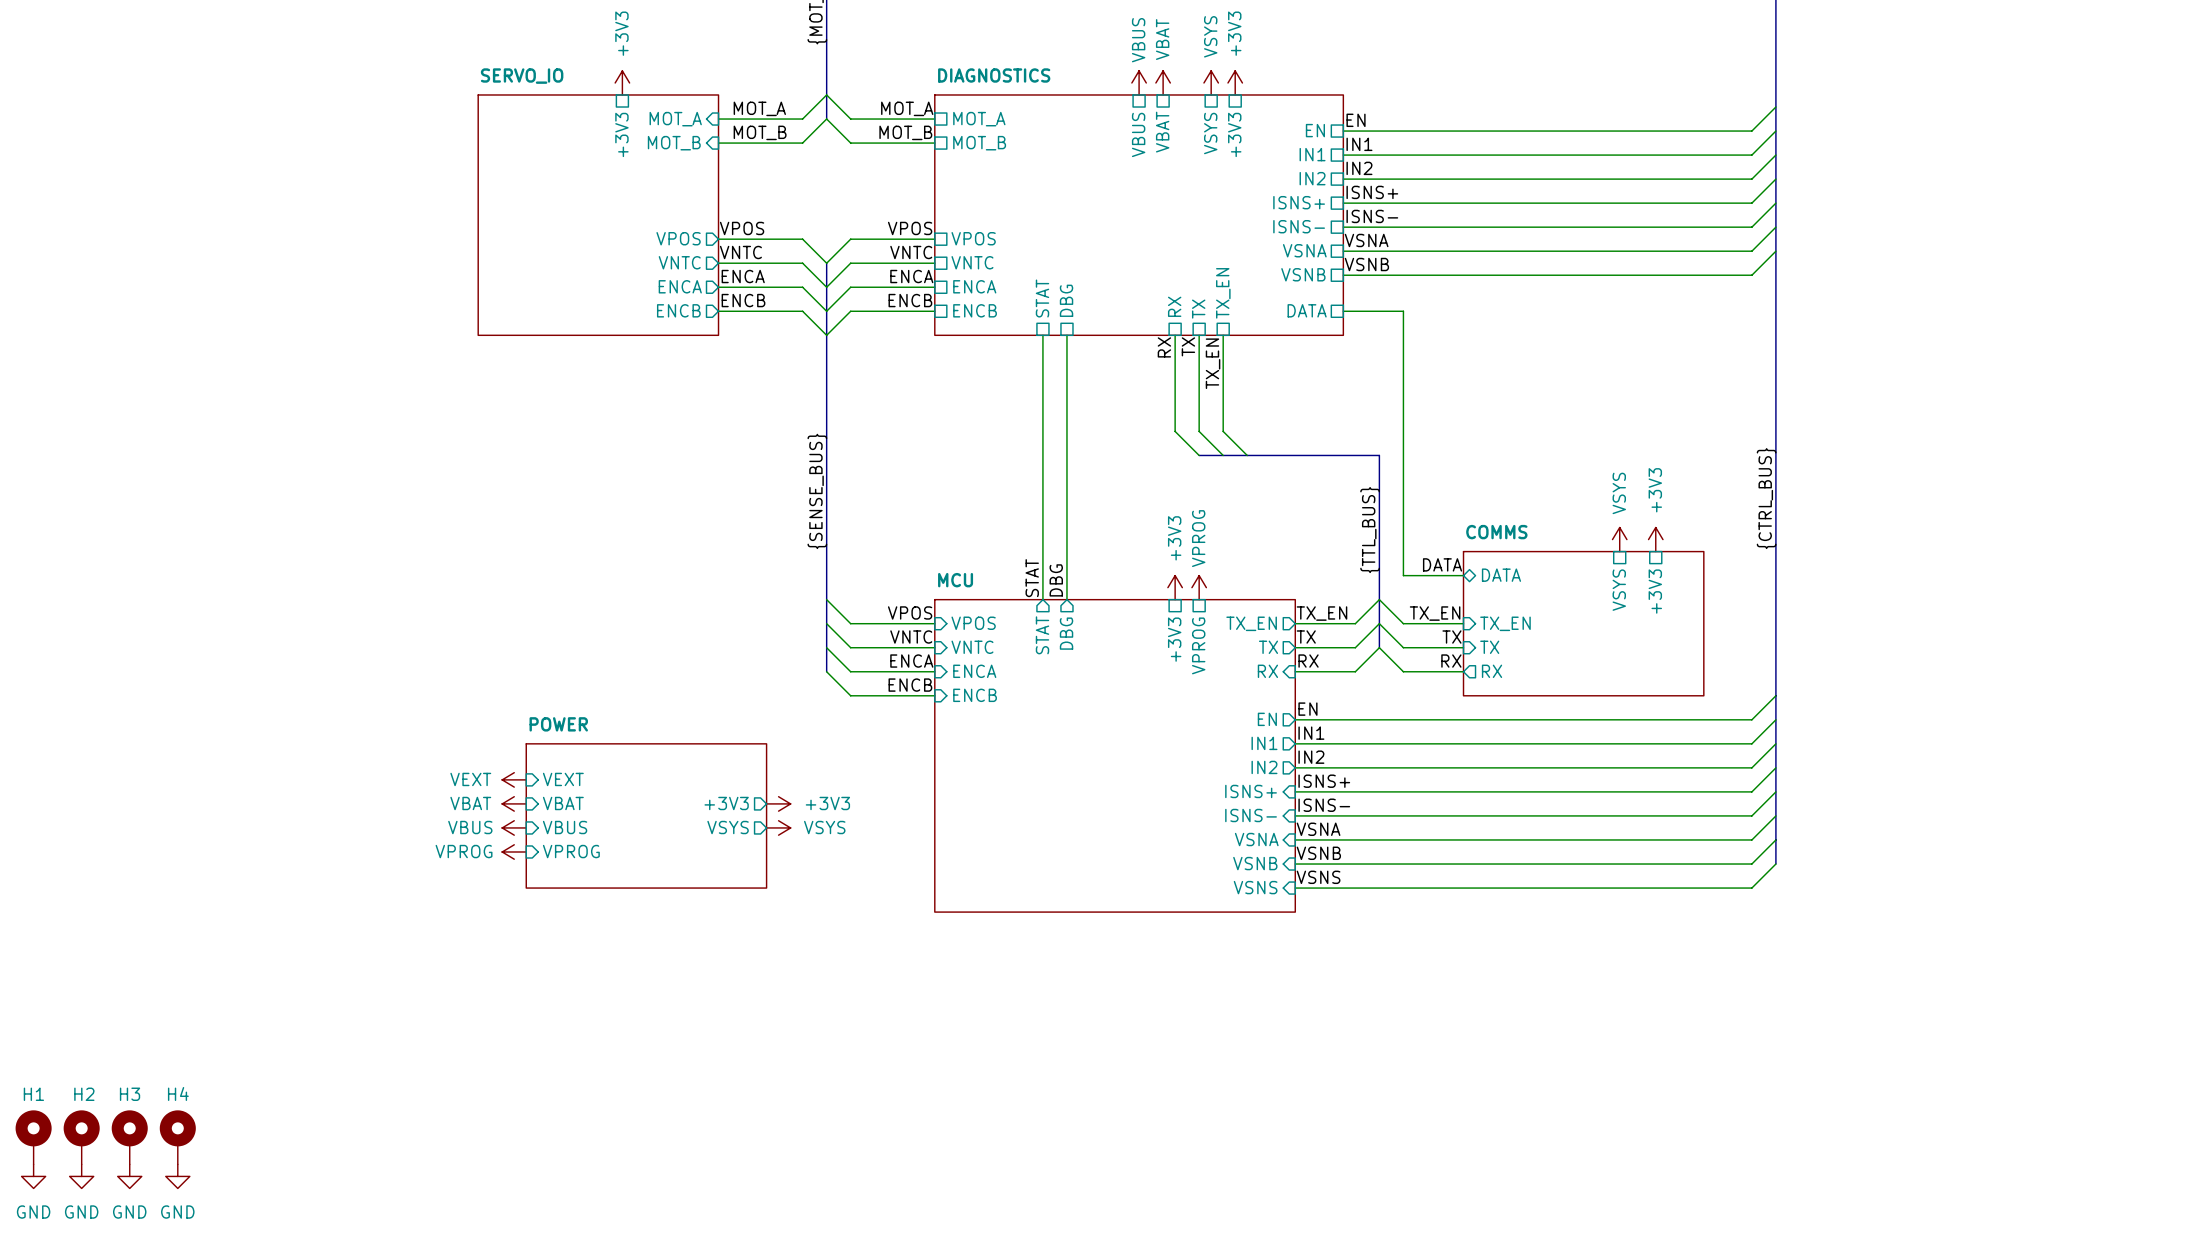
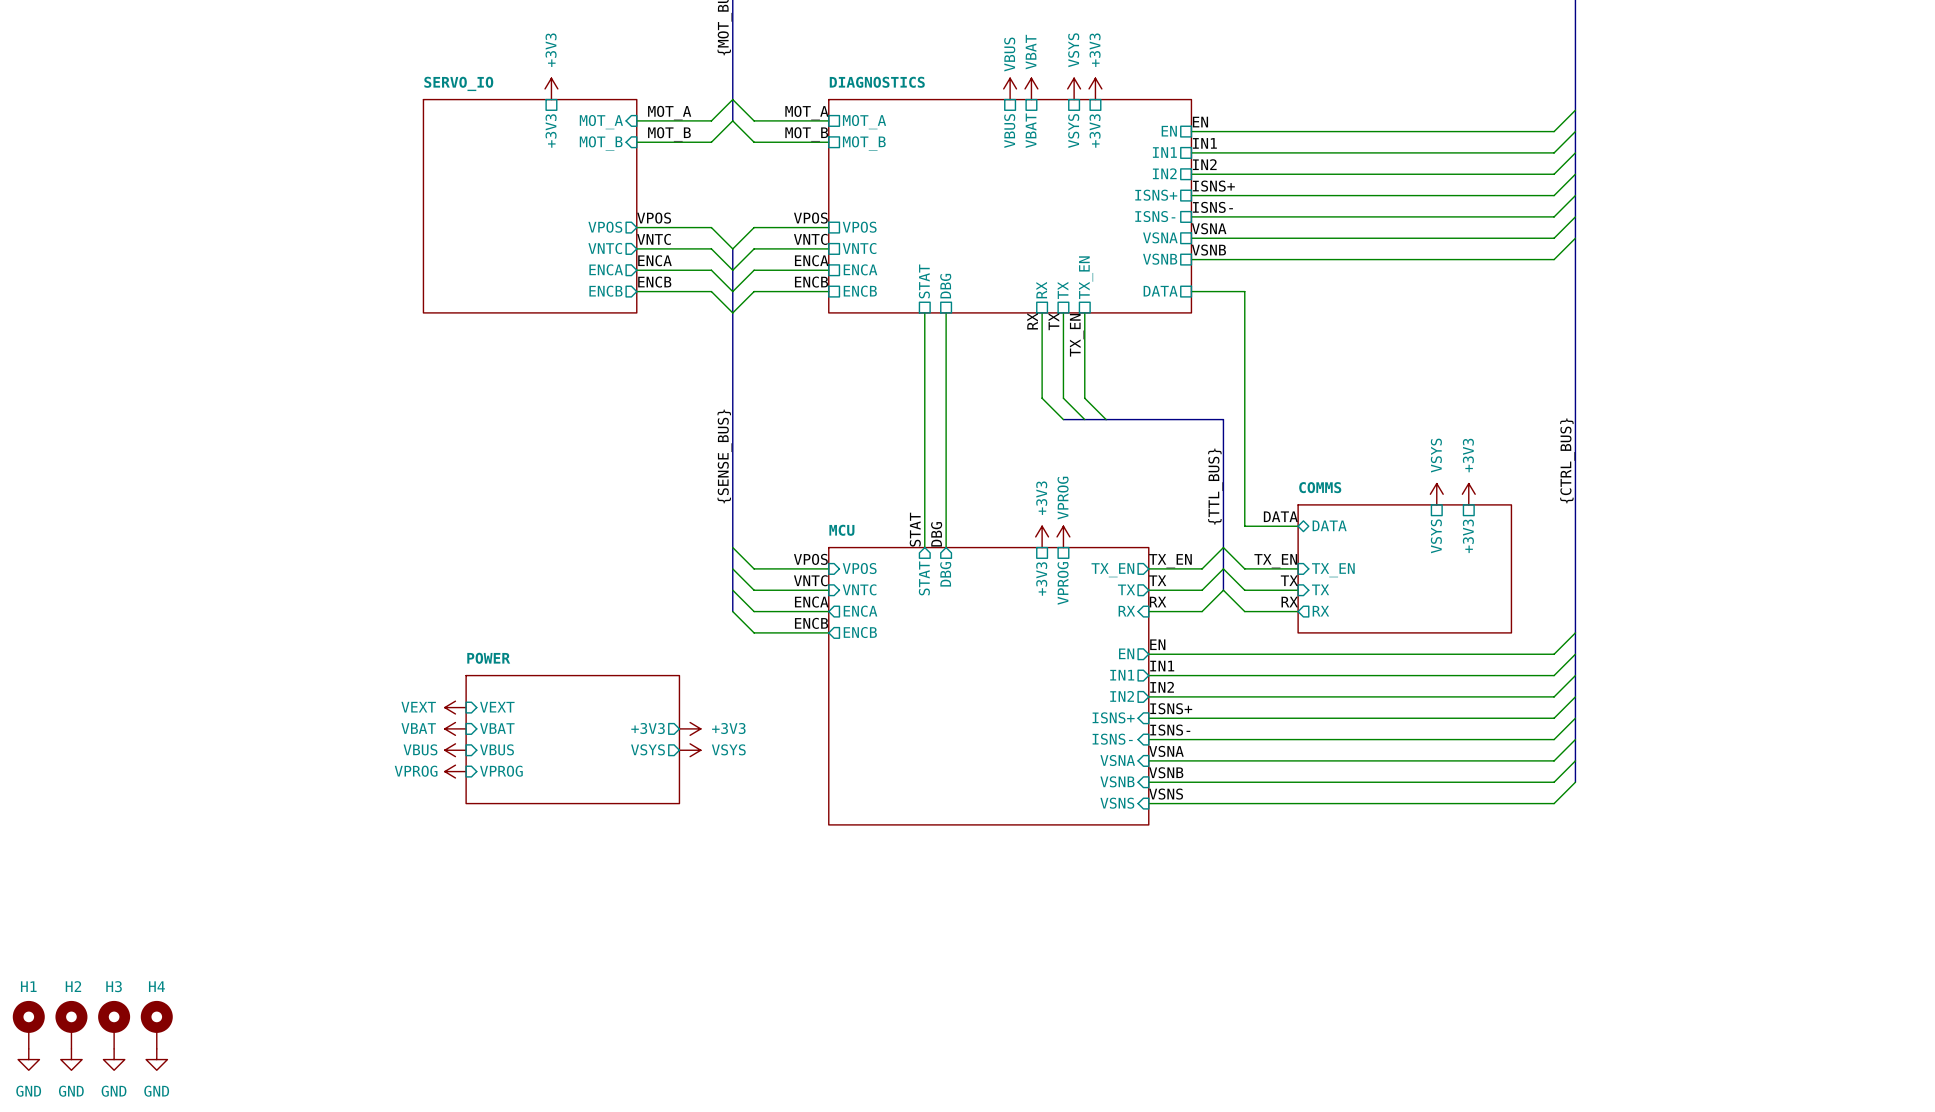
sheet pin shape: input (974, 671) -> output (860, 611)
sheet pin shape: input (975, 695) -> output (860, 632)

